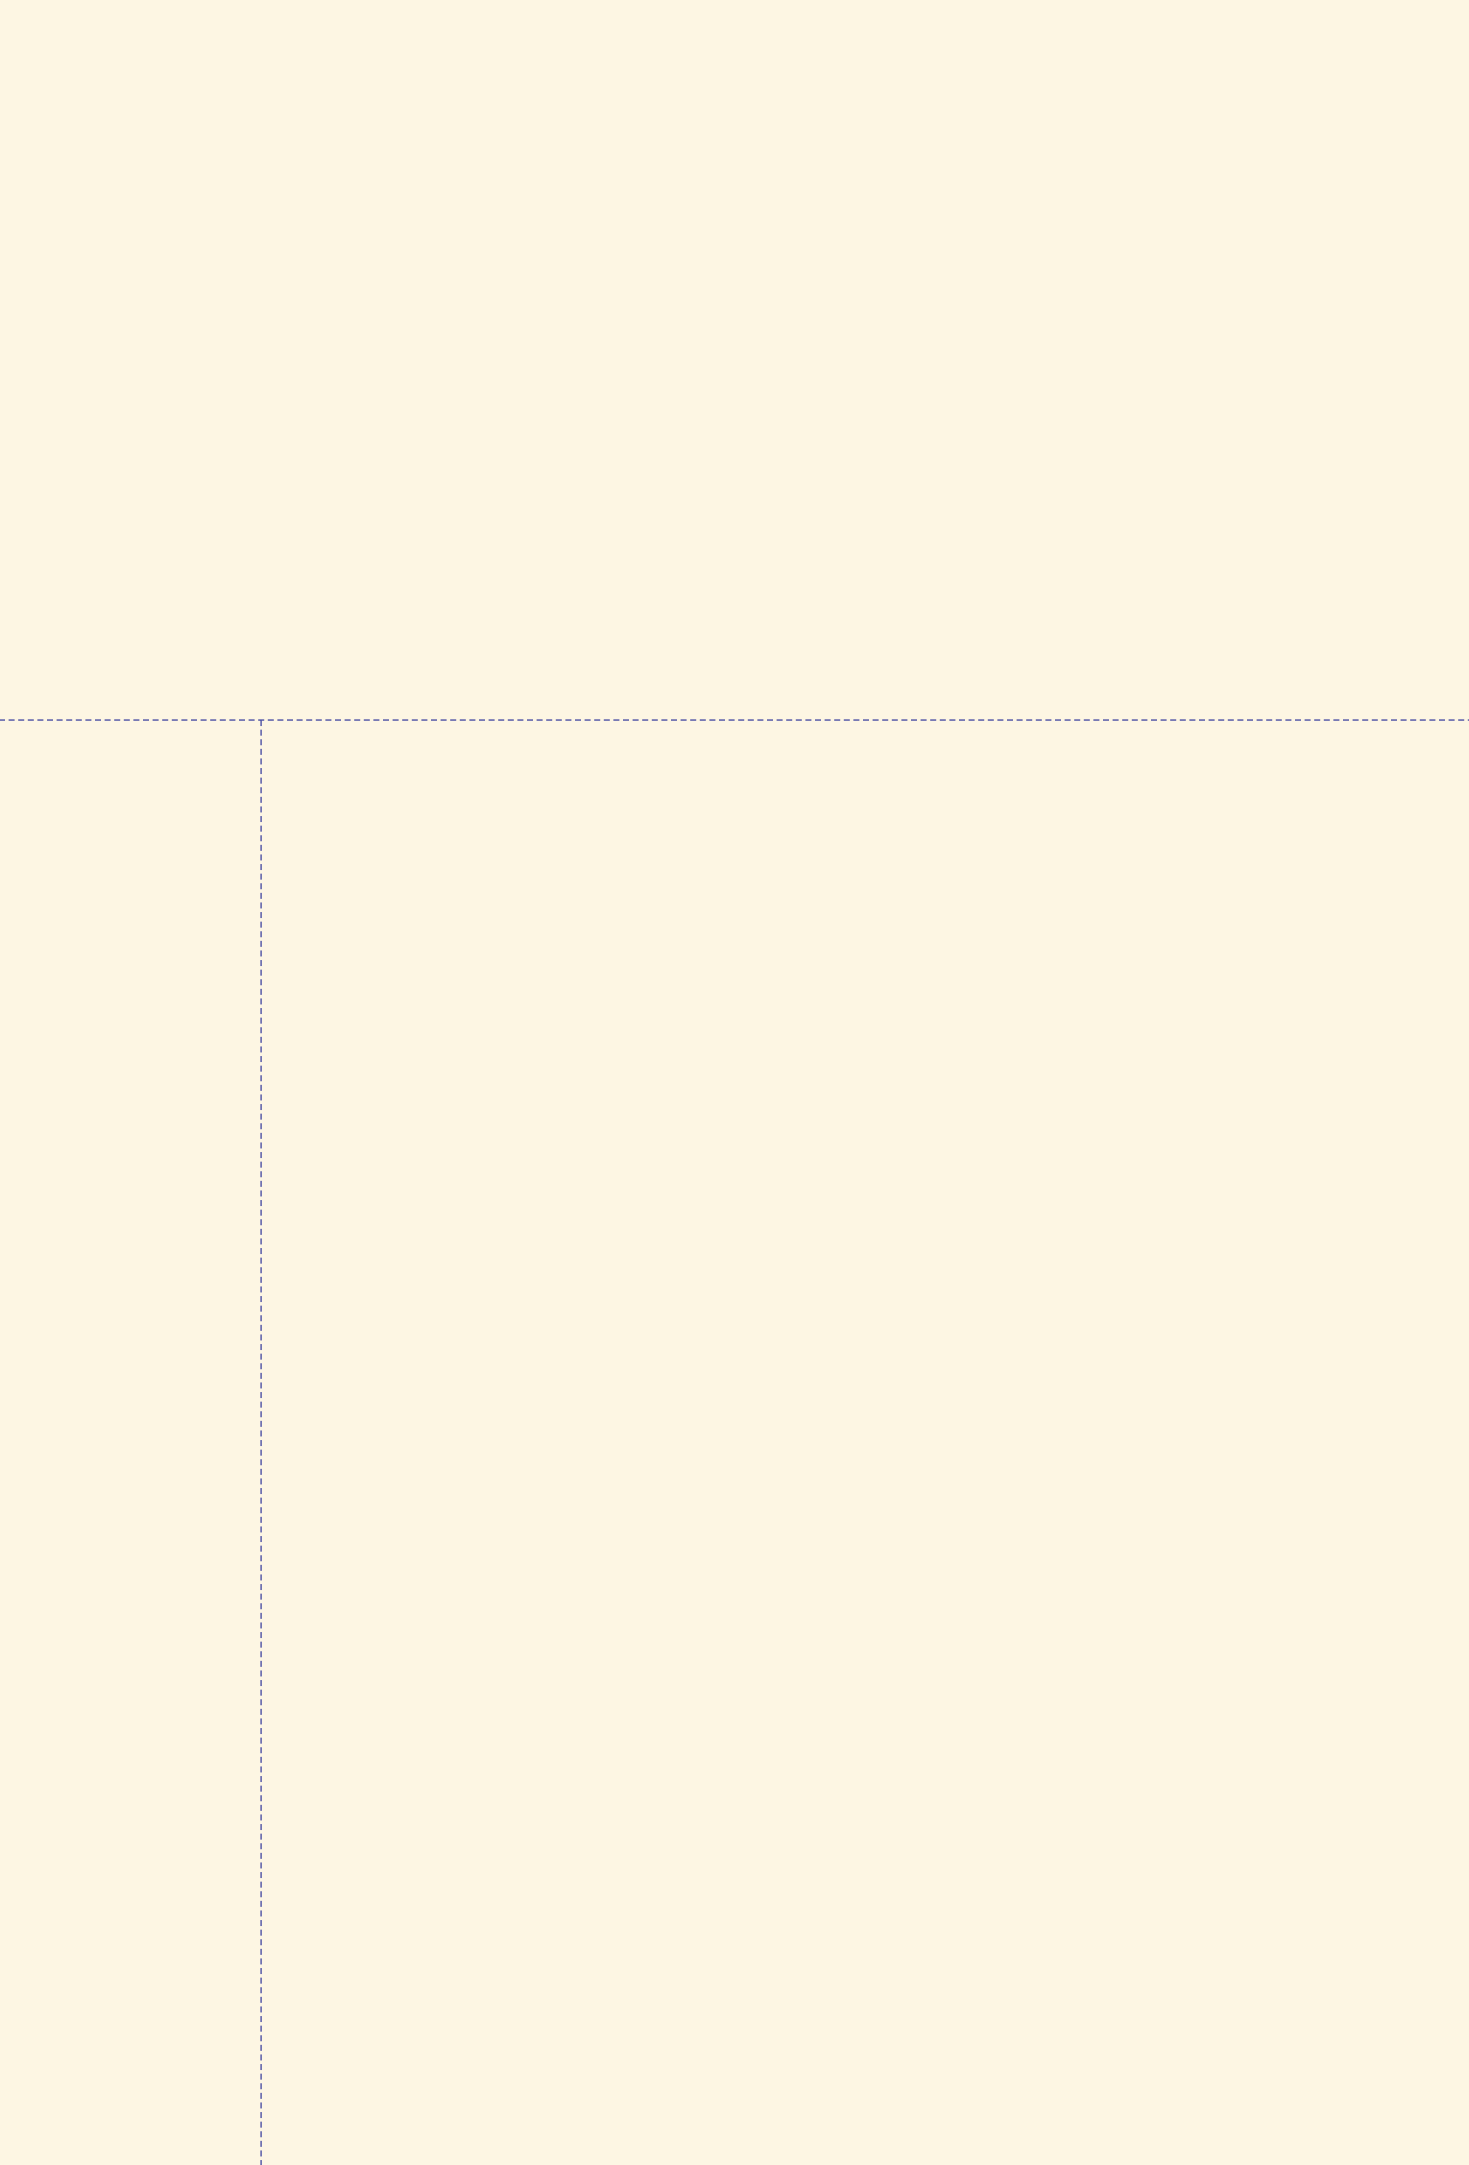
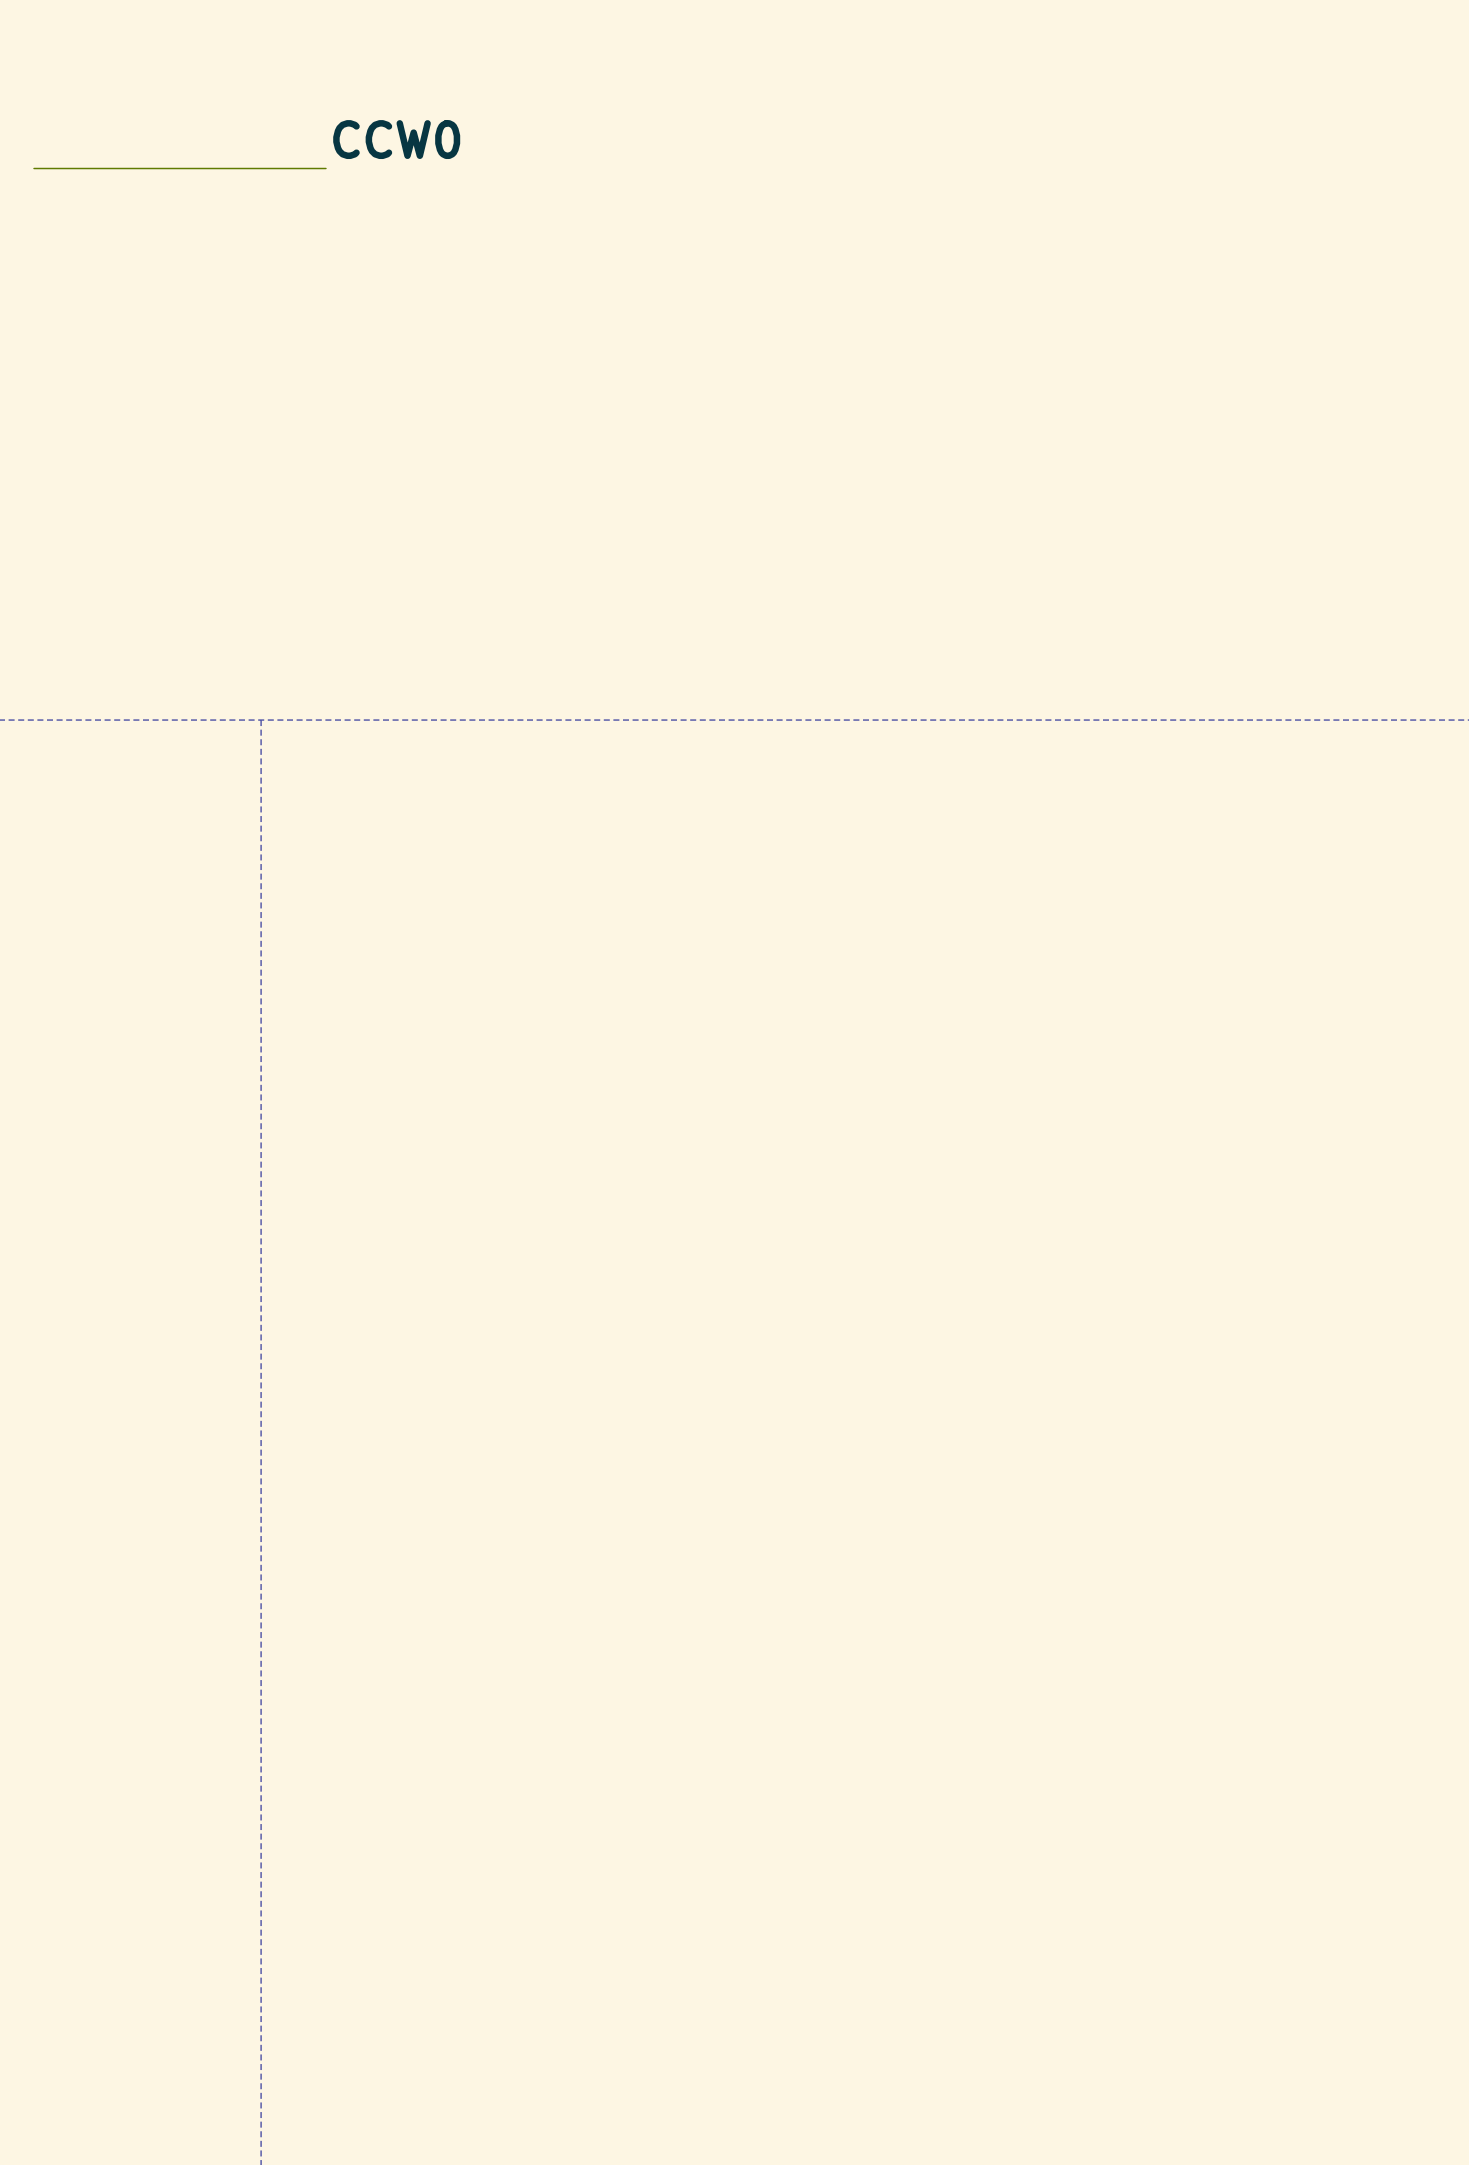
label: none -> CCW0 (396, 139)
wire: none -> (33, 168) (325, 168)

